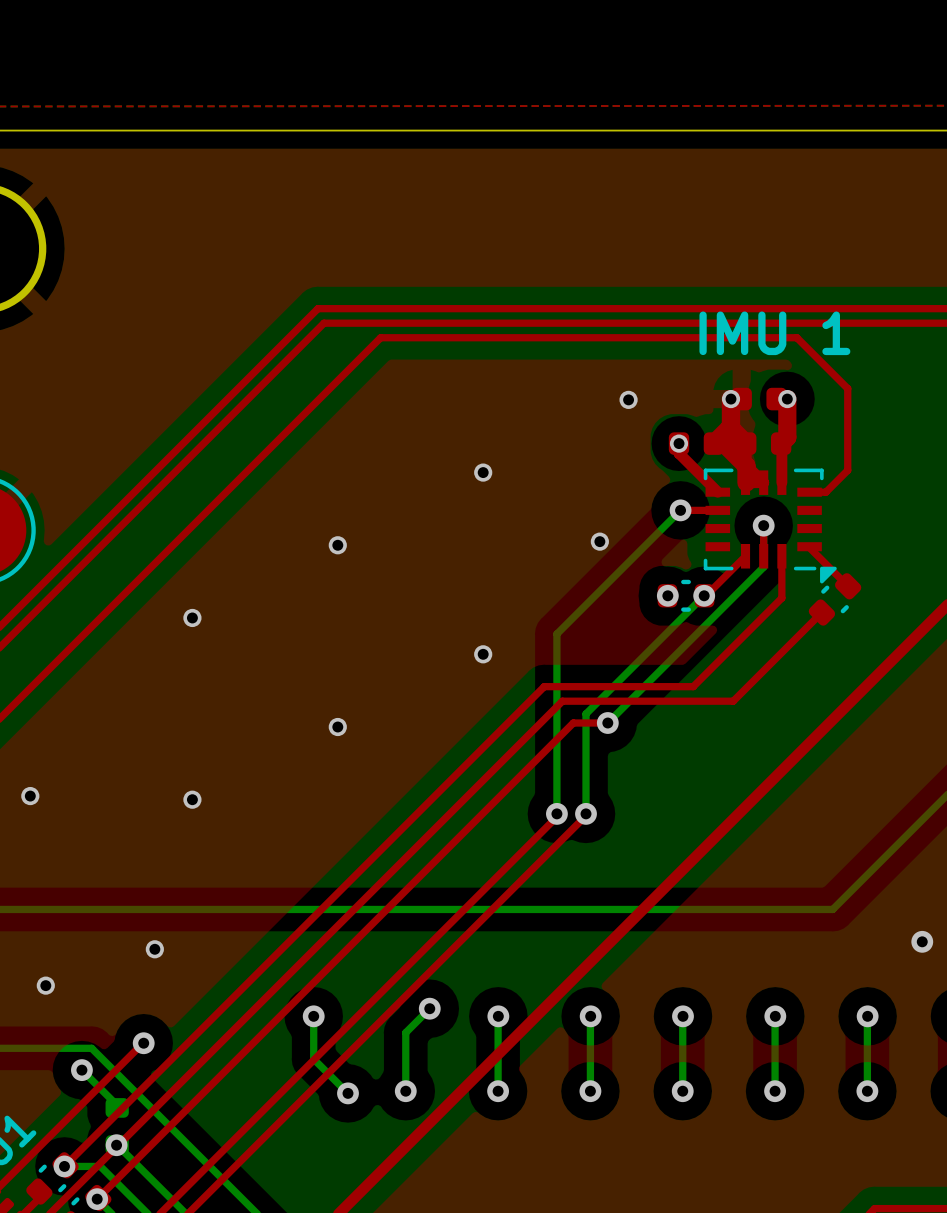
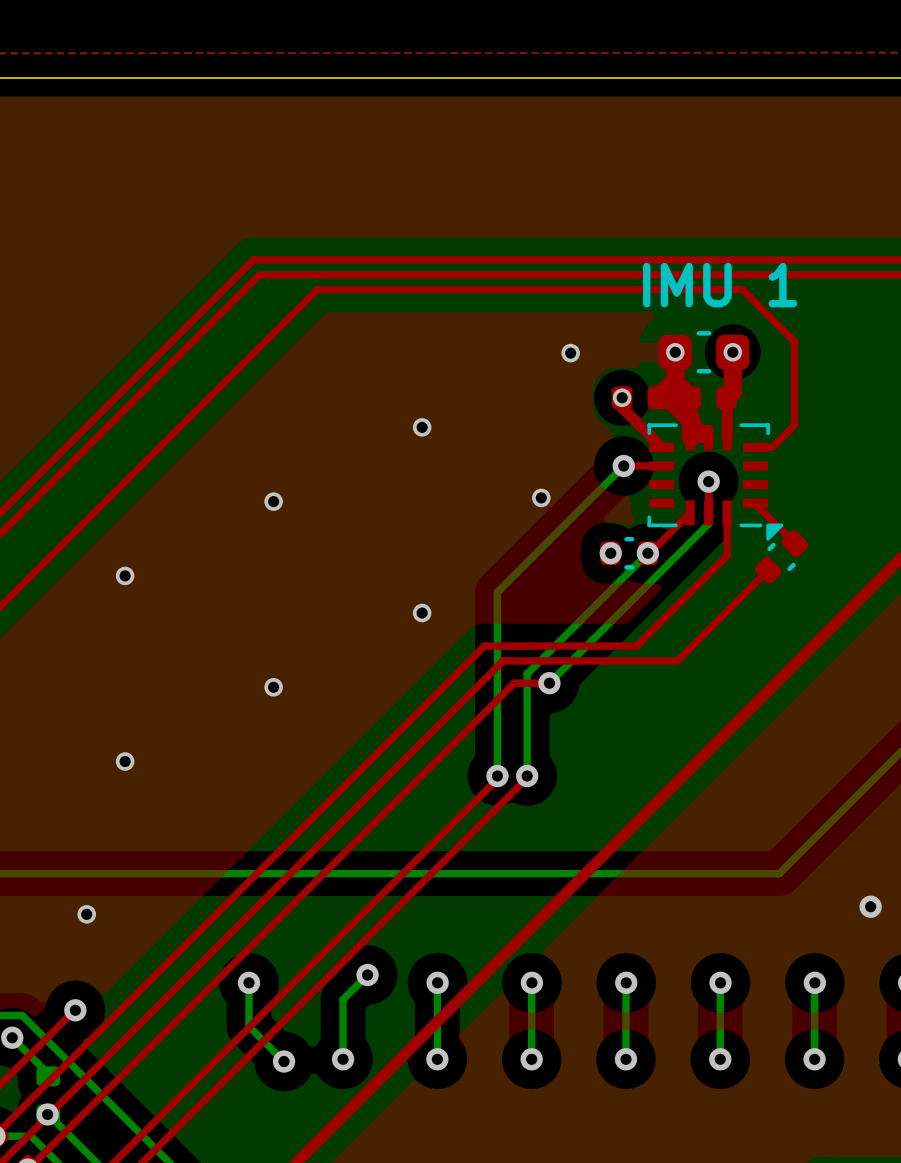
part footprint: [731, 387, 787, 411] -> [658, 331, 750, 374]

